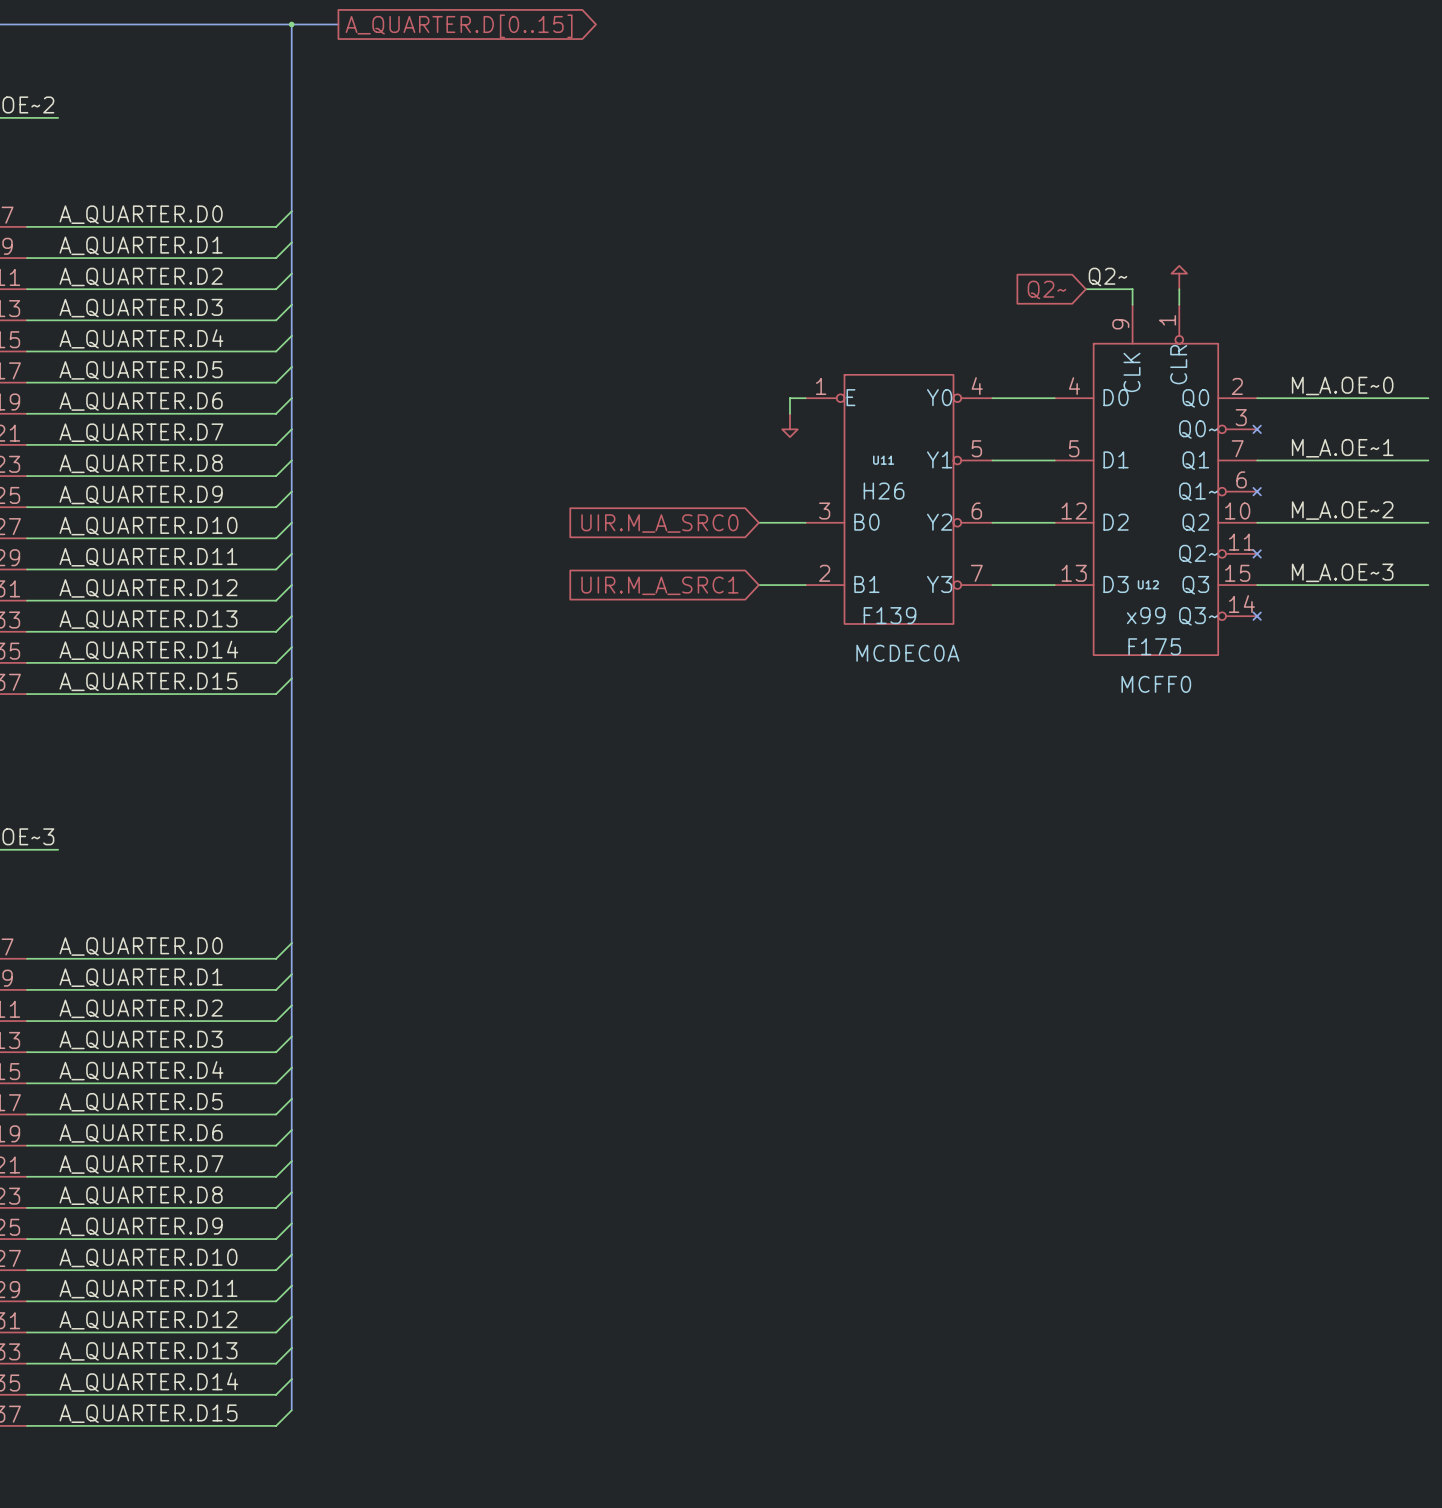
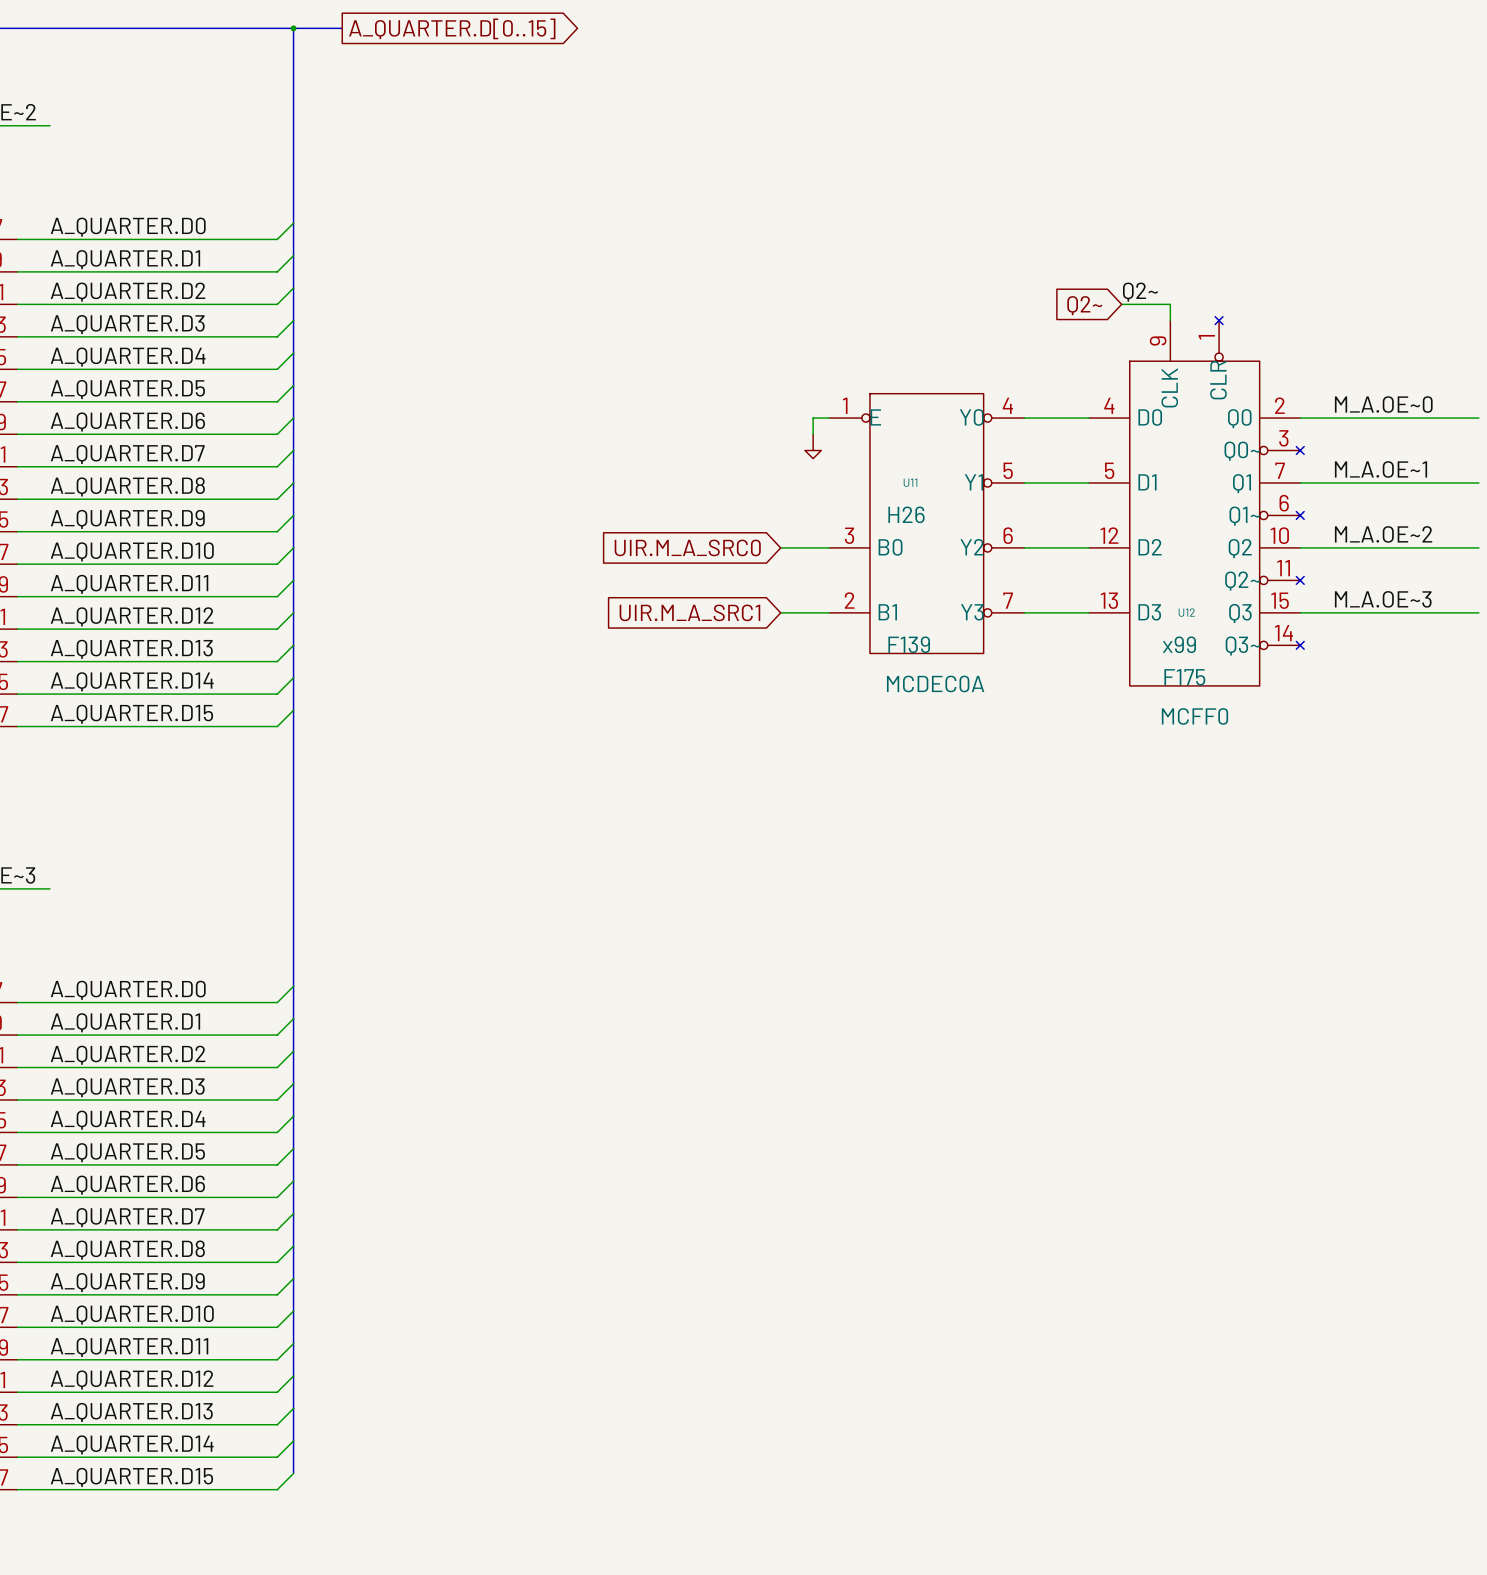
power symbol: (1179, 277) -> none
wire: (1179, 289) (1179, 304) -> none
no-connect mark: none -> (1219, 320)

